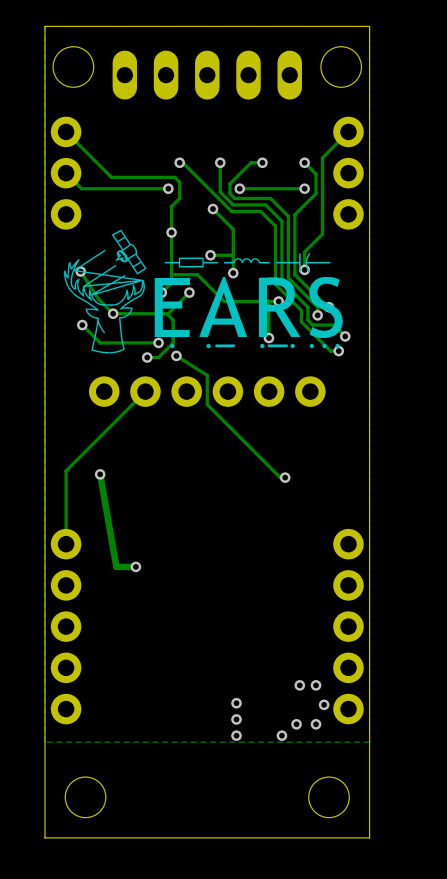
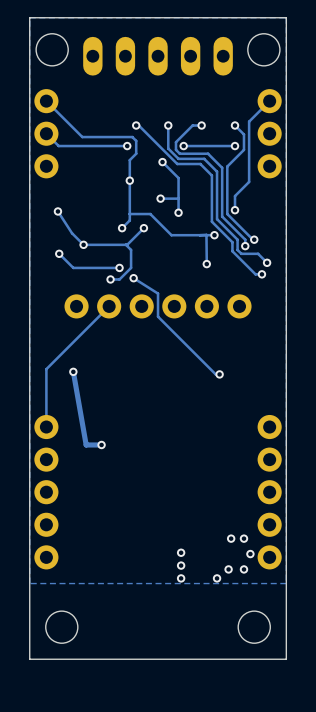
drawing: [63, 229, 343, 354] -> none

